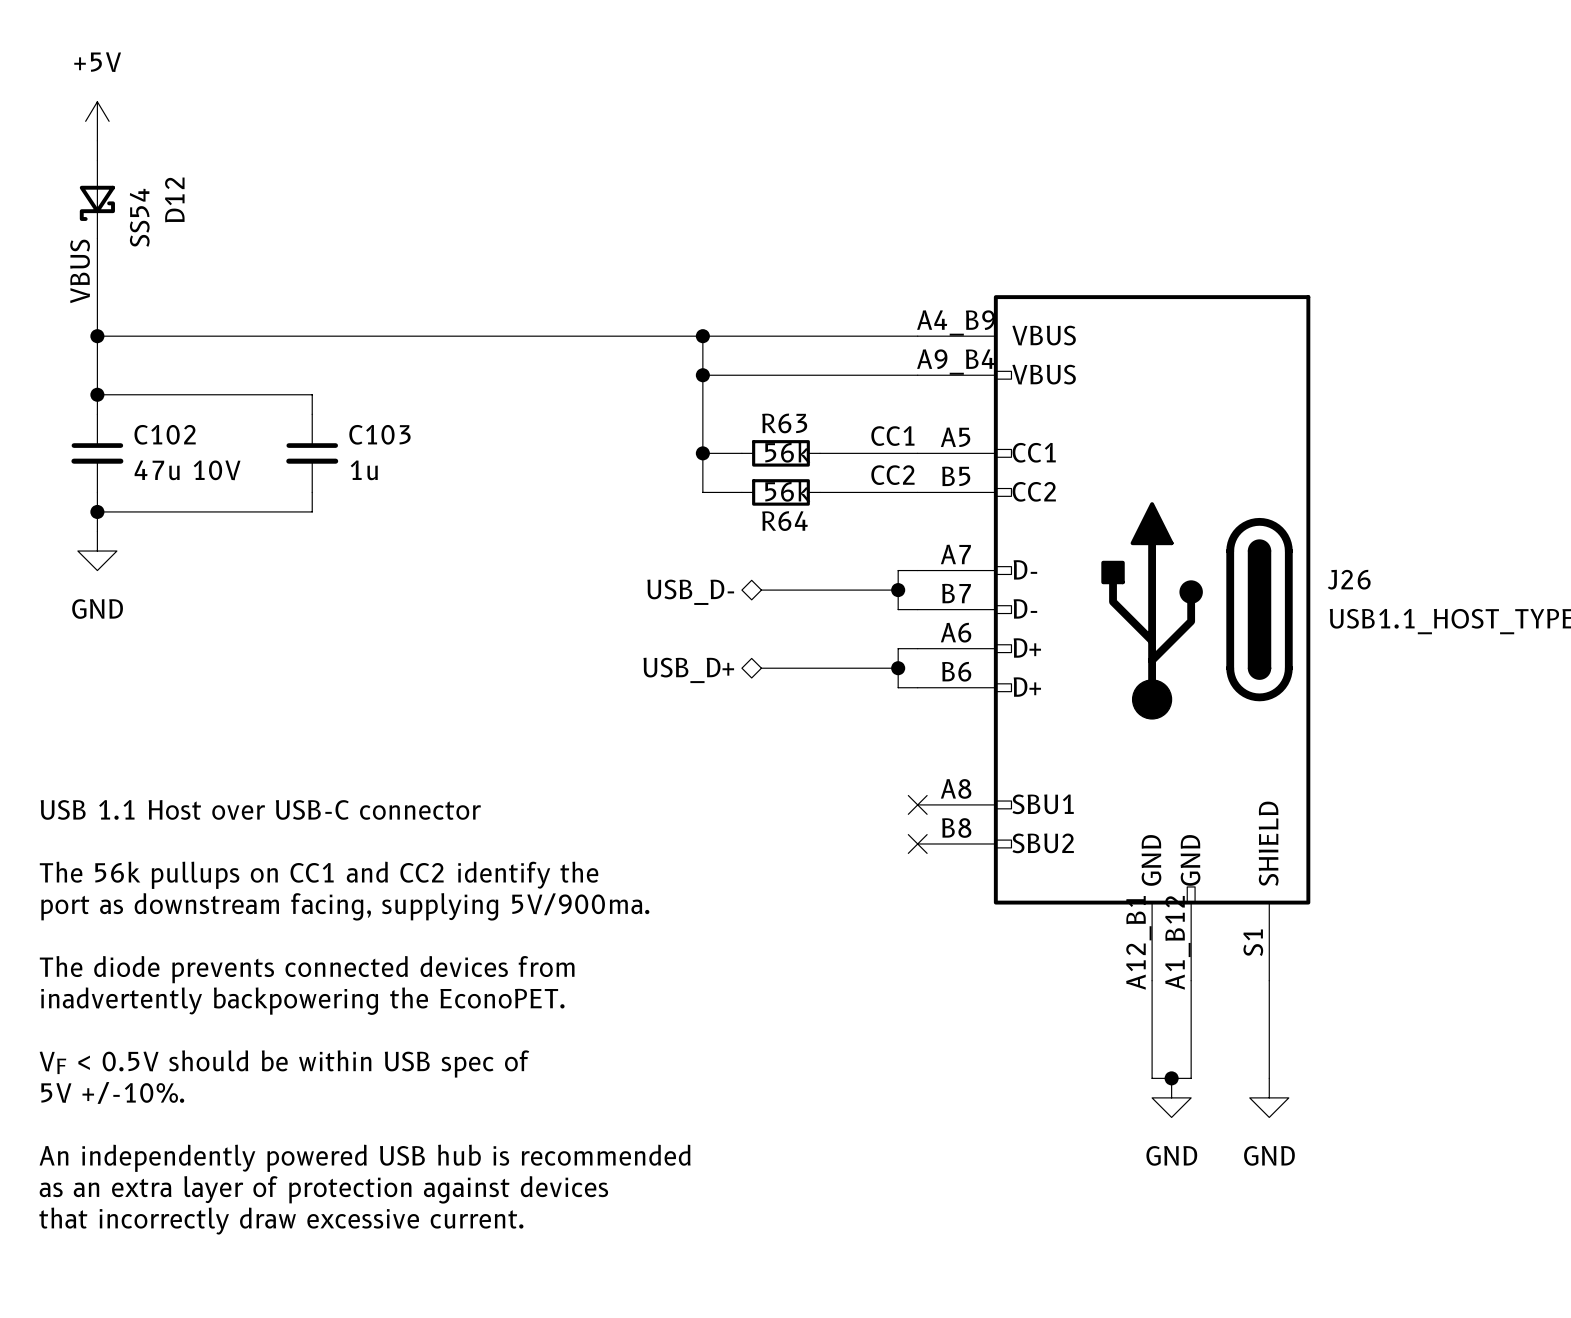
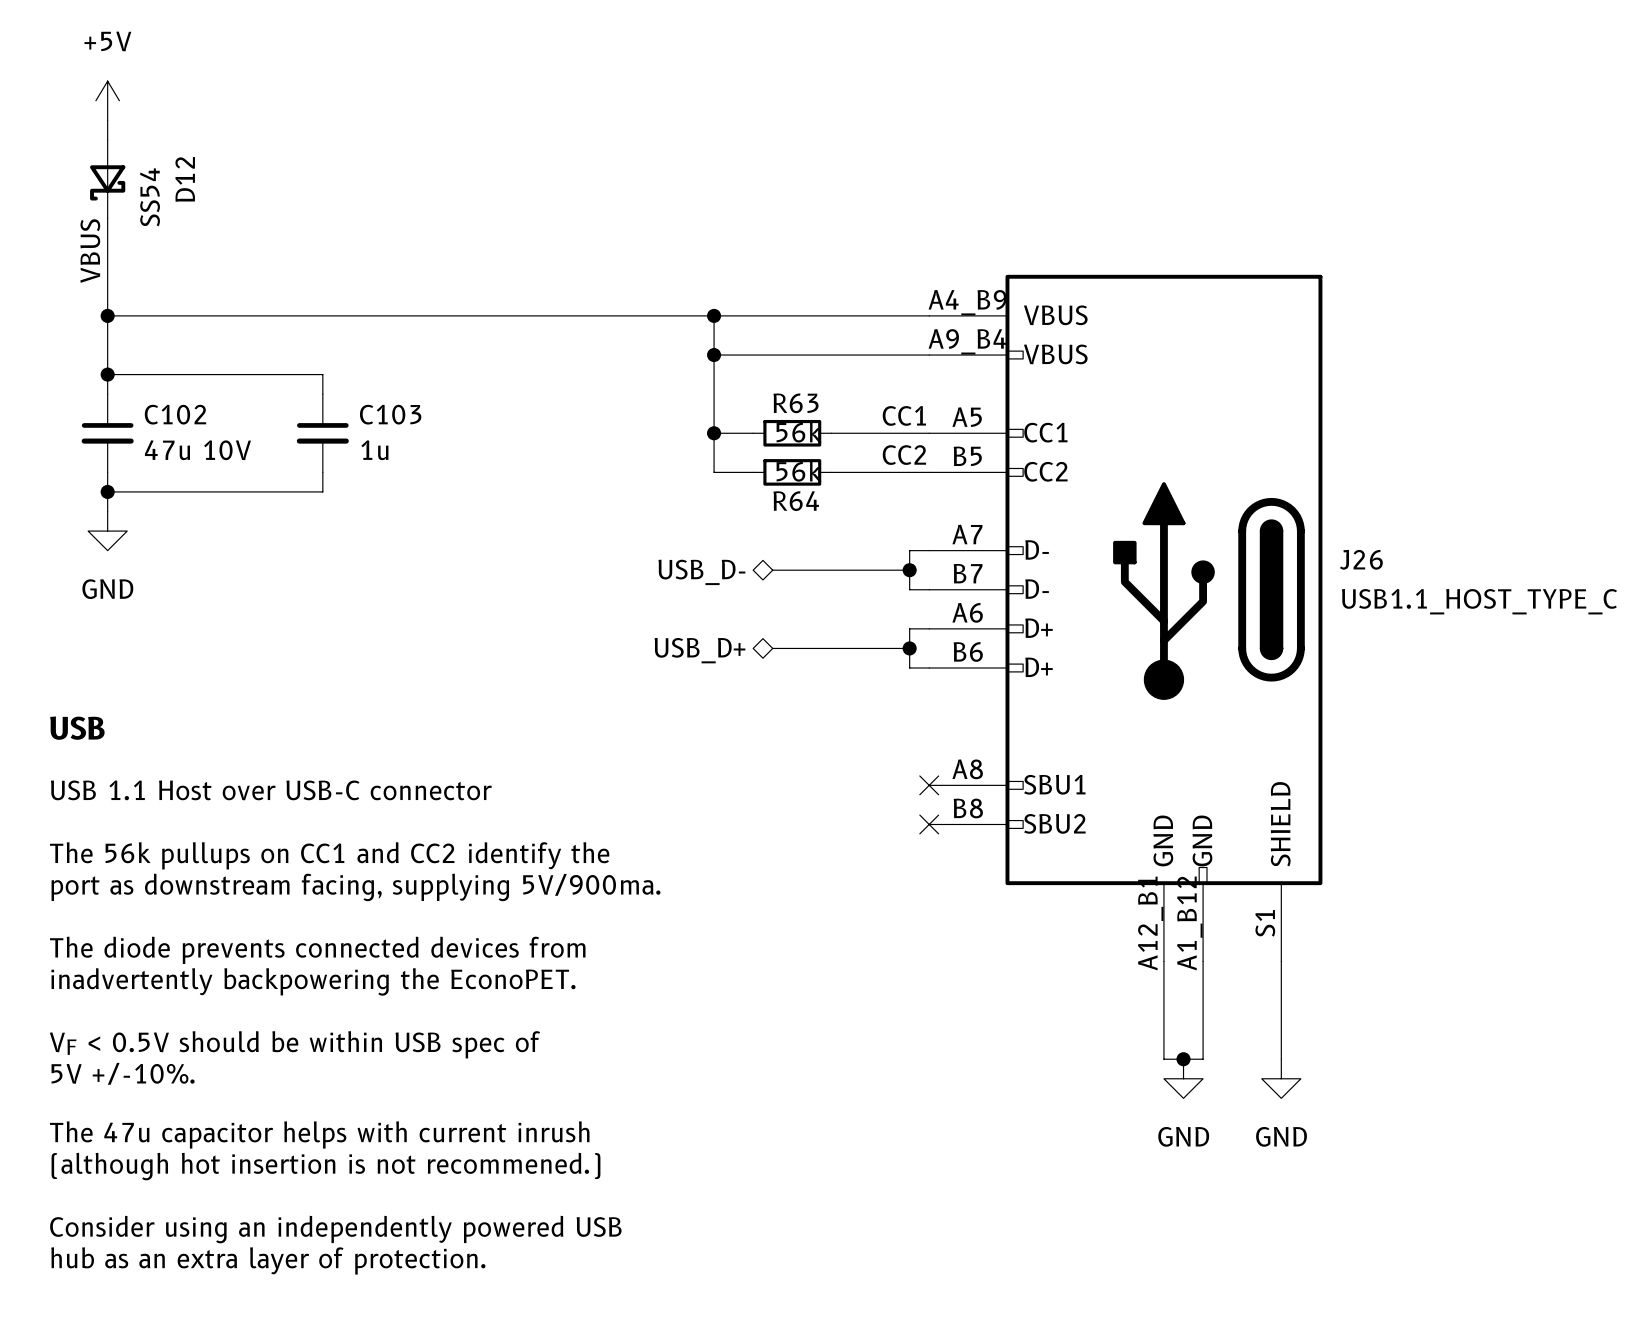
text: none -> USB (77, 728)
text: An independently powered USB hub is recommended (365, 1158) -> The 47u capacitor helps with current inrush (319, 1134)
text: as an extra layer of protection against devices (323, 1189) -> (although hot insertion is not recommened.) (325, 1166)
text: that incorrectly draw excessive current. (281, 1221) -> none
text: none -> Consider using an independently powered USB (335, 1229)
text: none -> hub as an extra layer of protection. (268, 1260)

